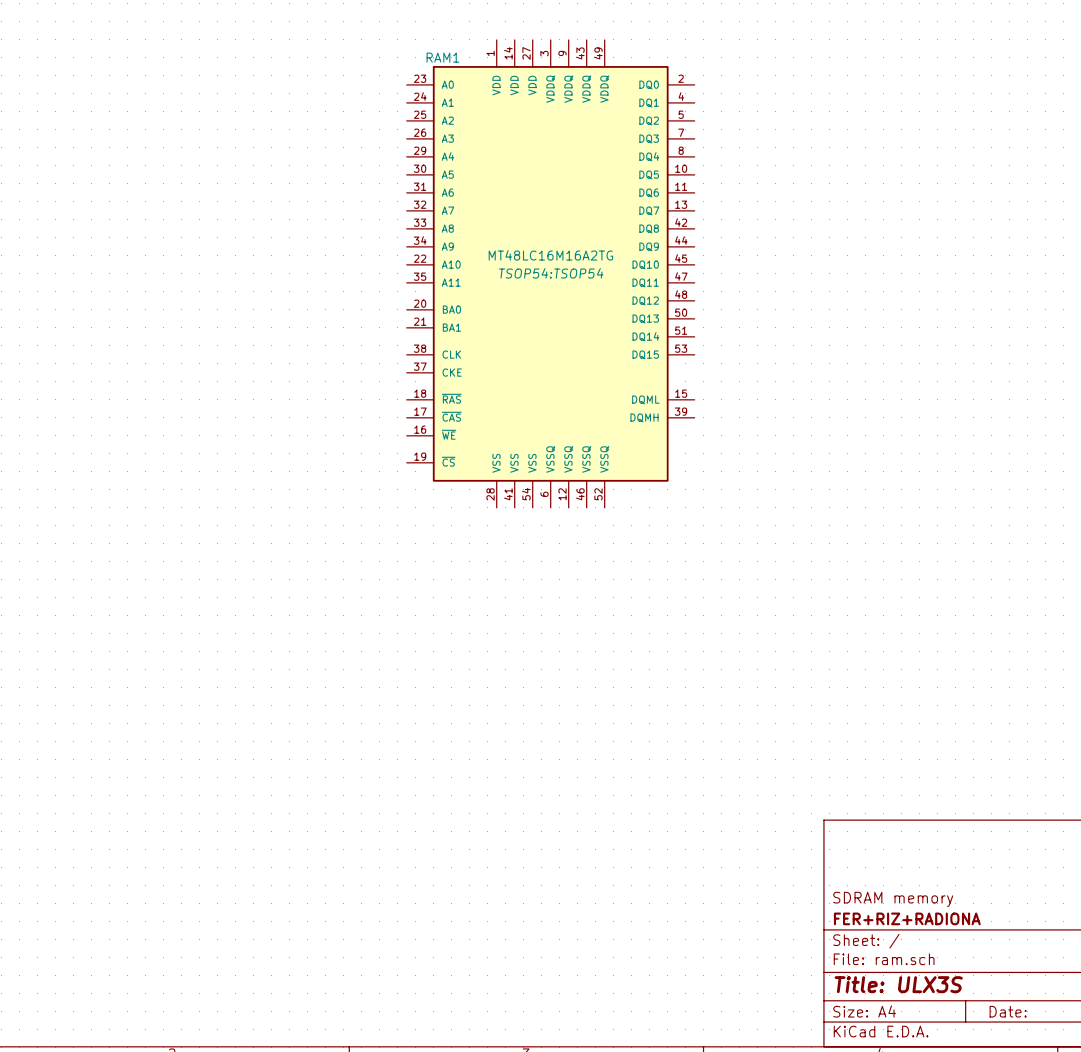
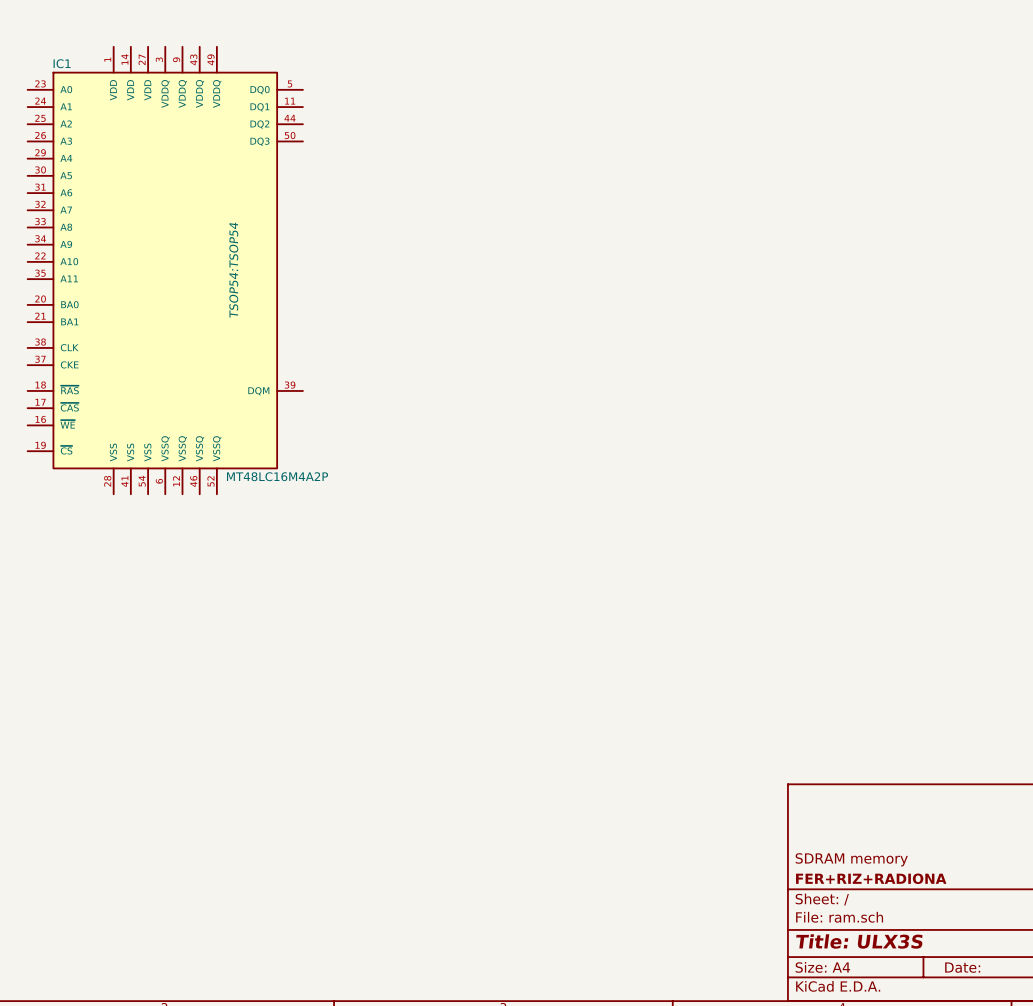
RAM1: MT48LC16M16A2TG (550, 273) -> none
IC1: none -> MT48LC16M4A2P (165, 270)

